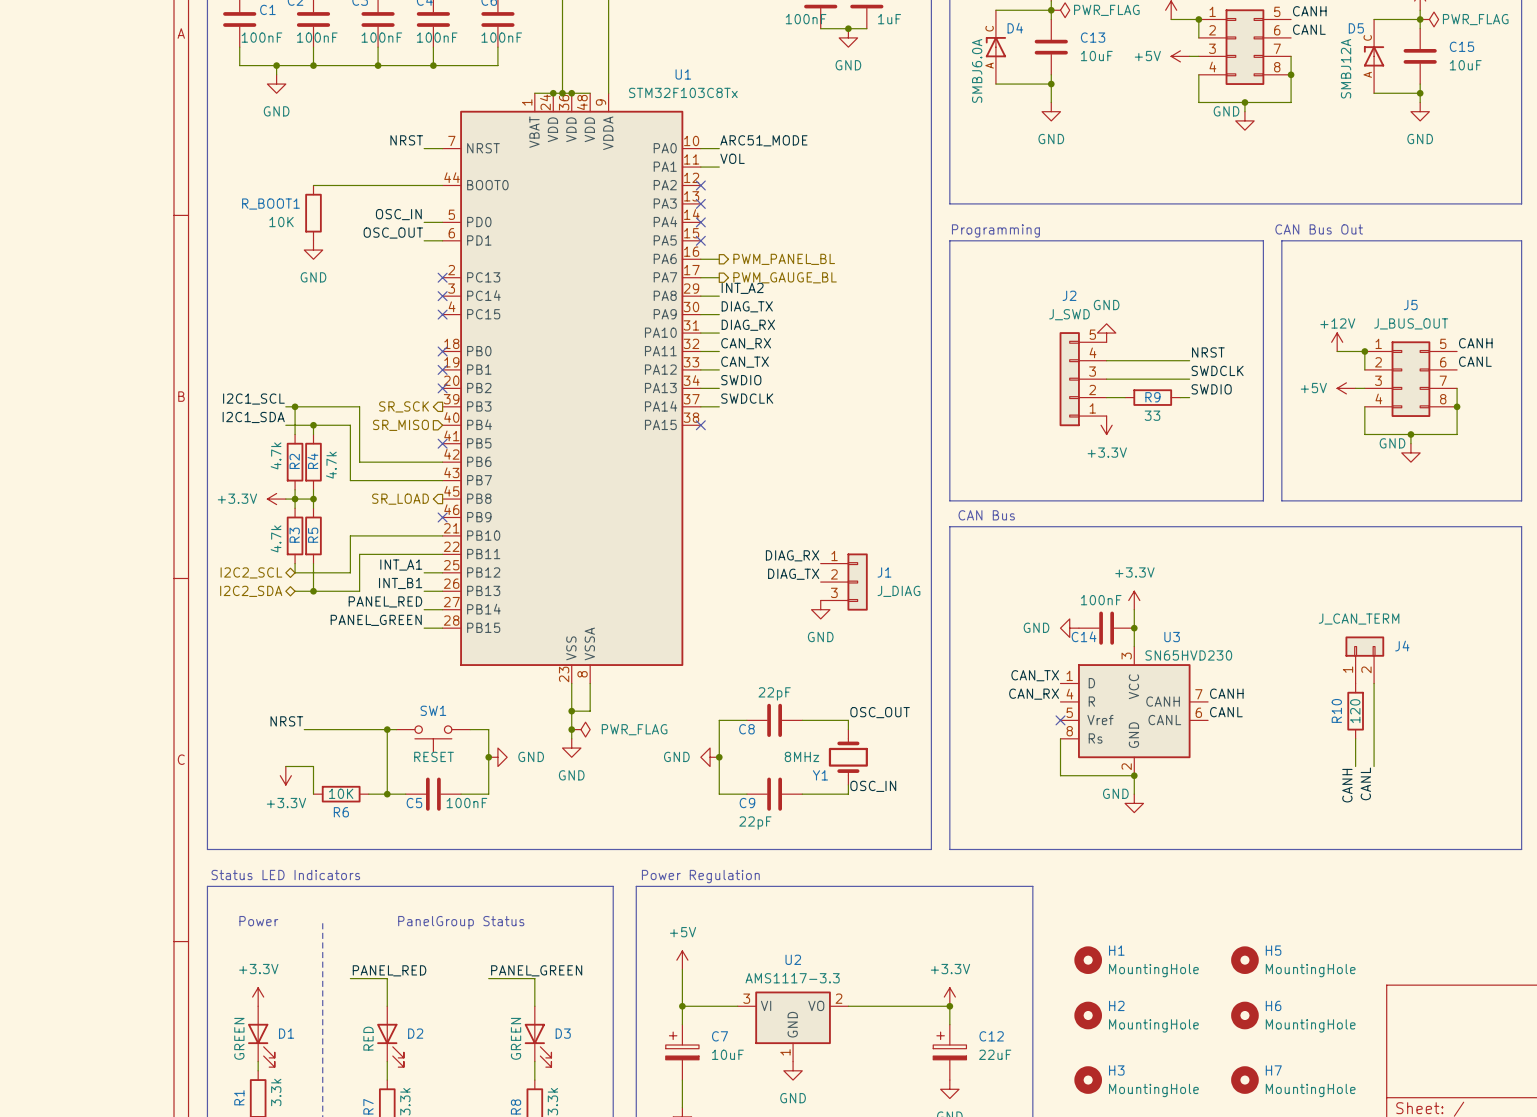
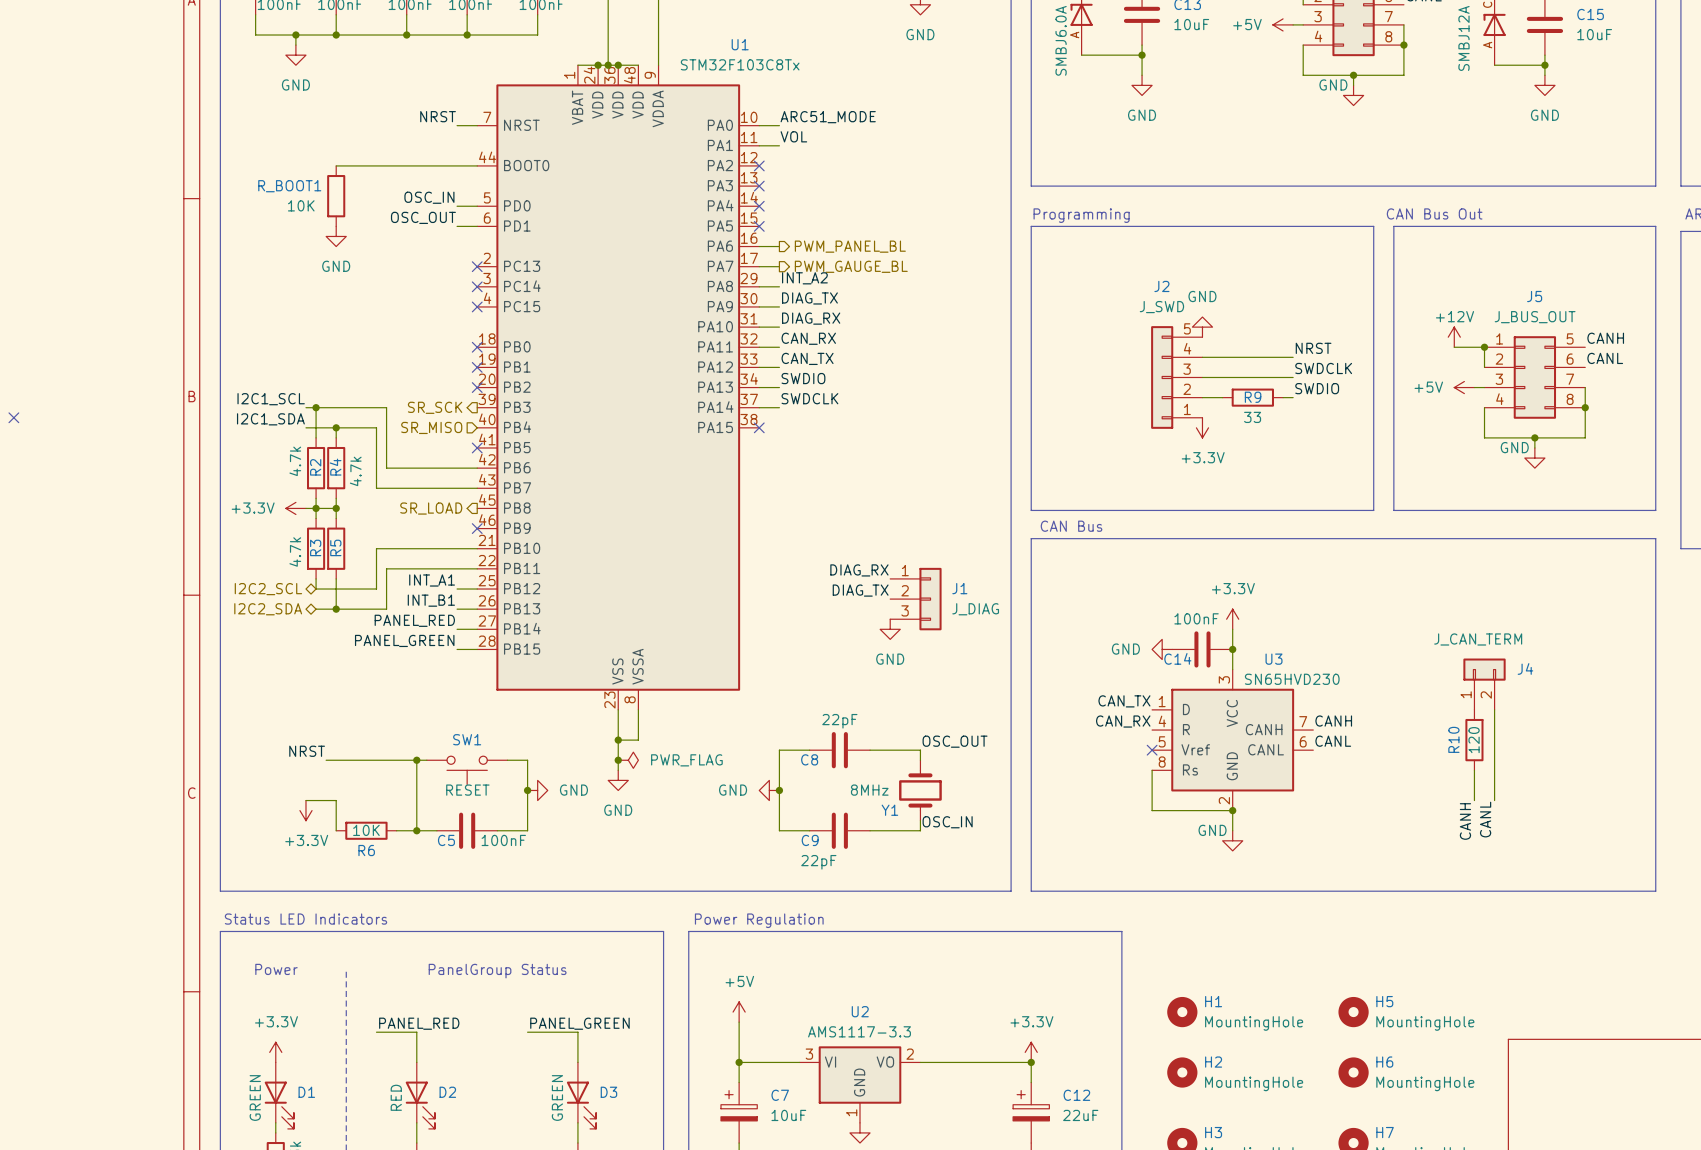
no-connect mark: none -> (13, 417)

